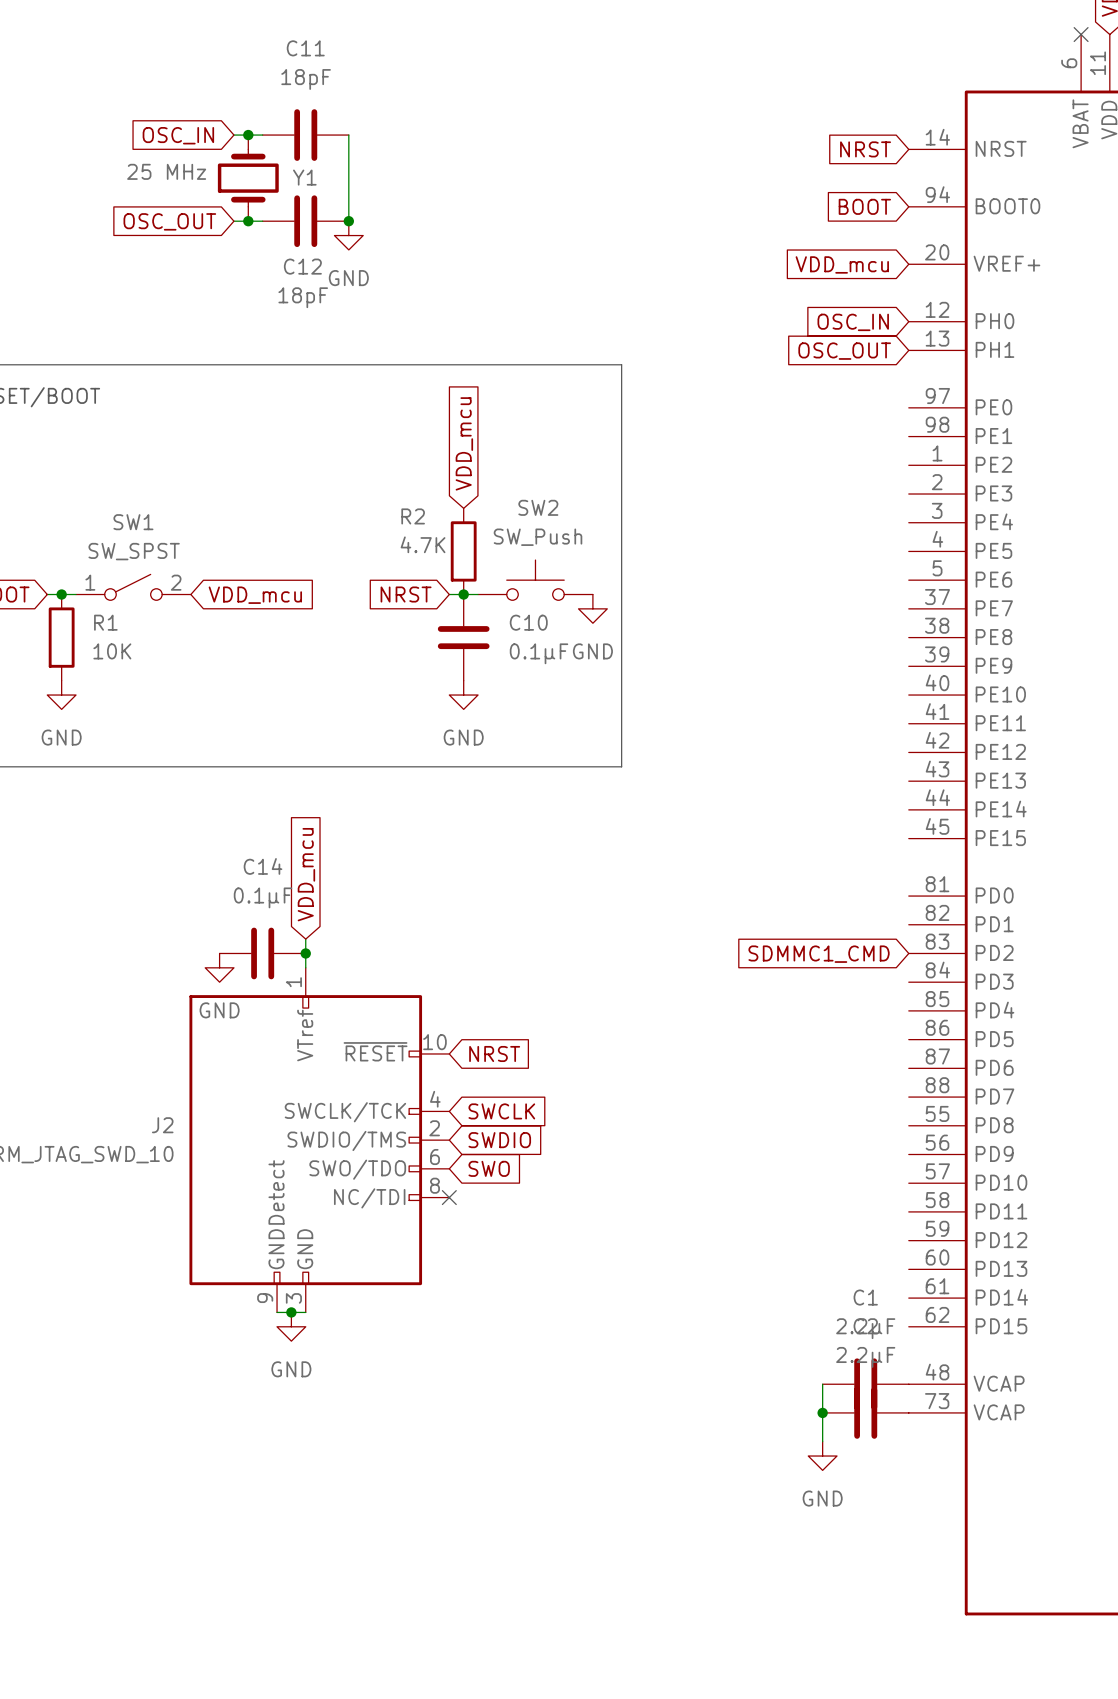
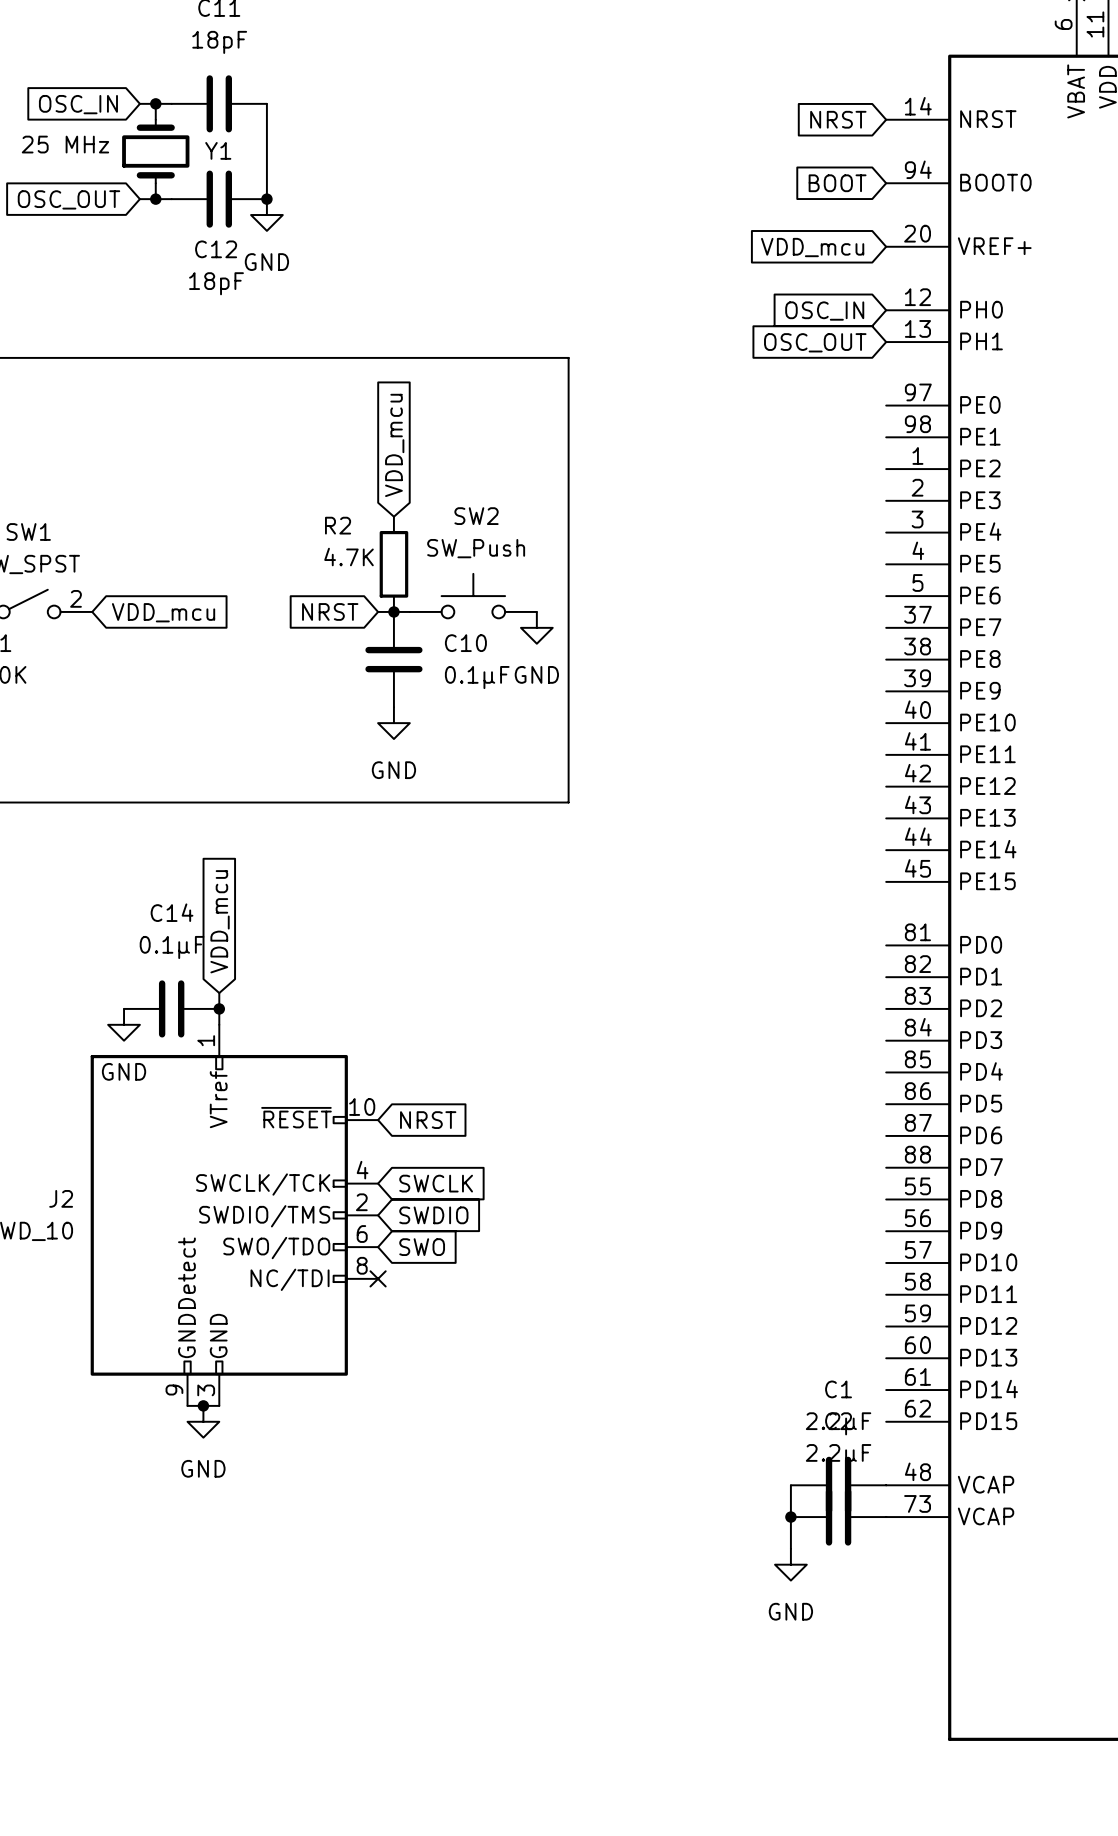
global label: SDMMC1_CMD (819, 954) -> none

